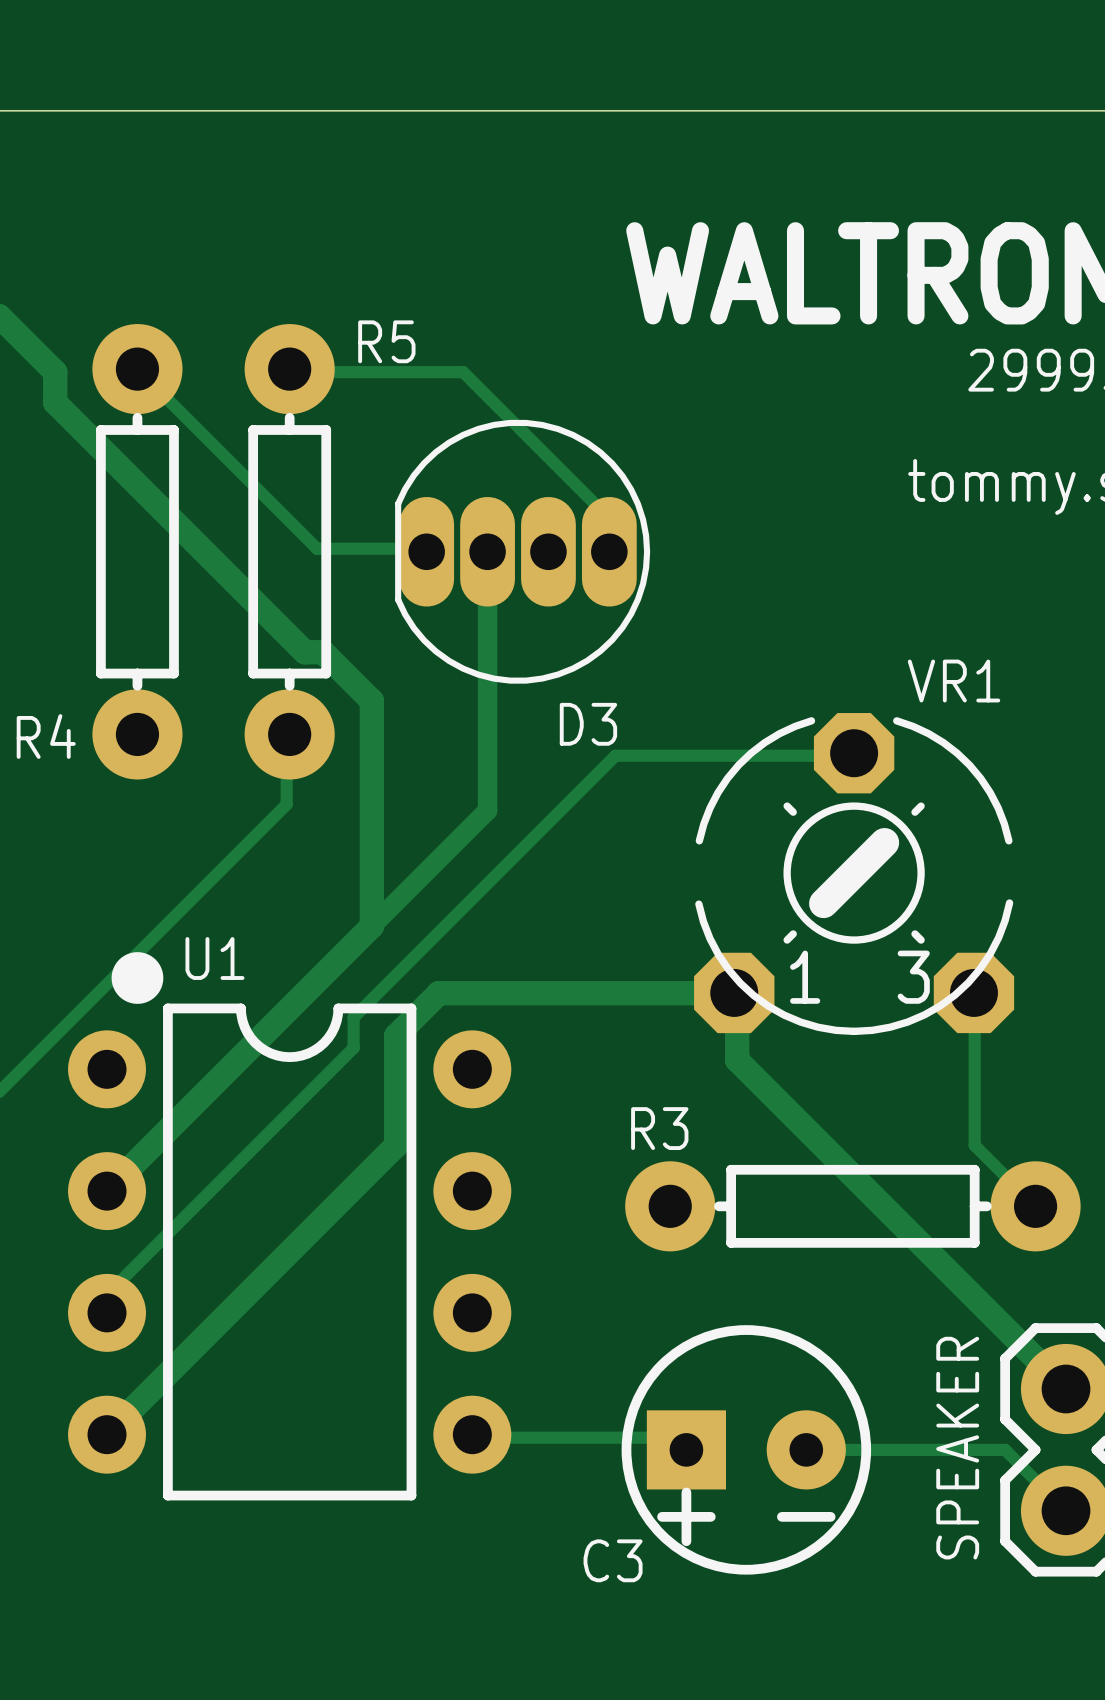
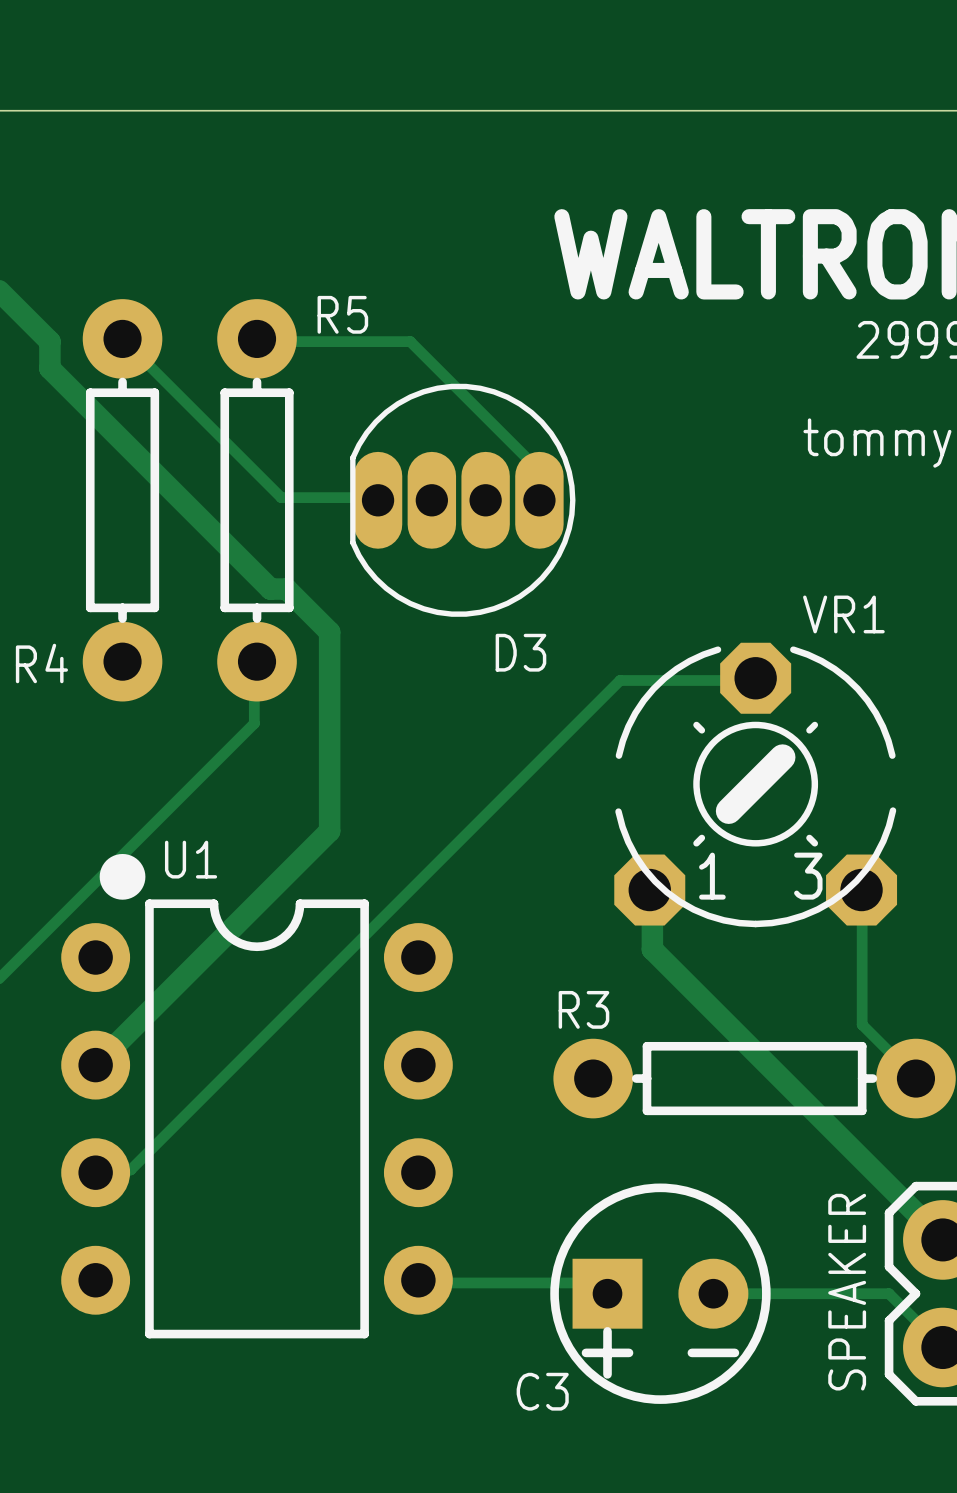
track: (487, 551) (487, 810) (371, 926) -> none
track: (700, 755) (615, 755) (353, 1017) (353, 1048) (110, 1291) (110, 1309) -> (620, 680) (130, 1170) (98, 1170)
track: (734, 992) (438, 993) (396, 1035) (396, 1145) (107, 1434) -> none

